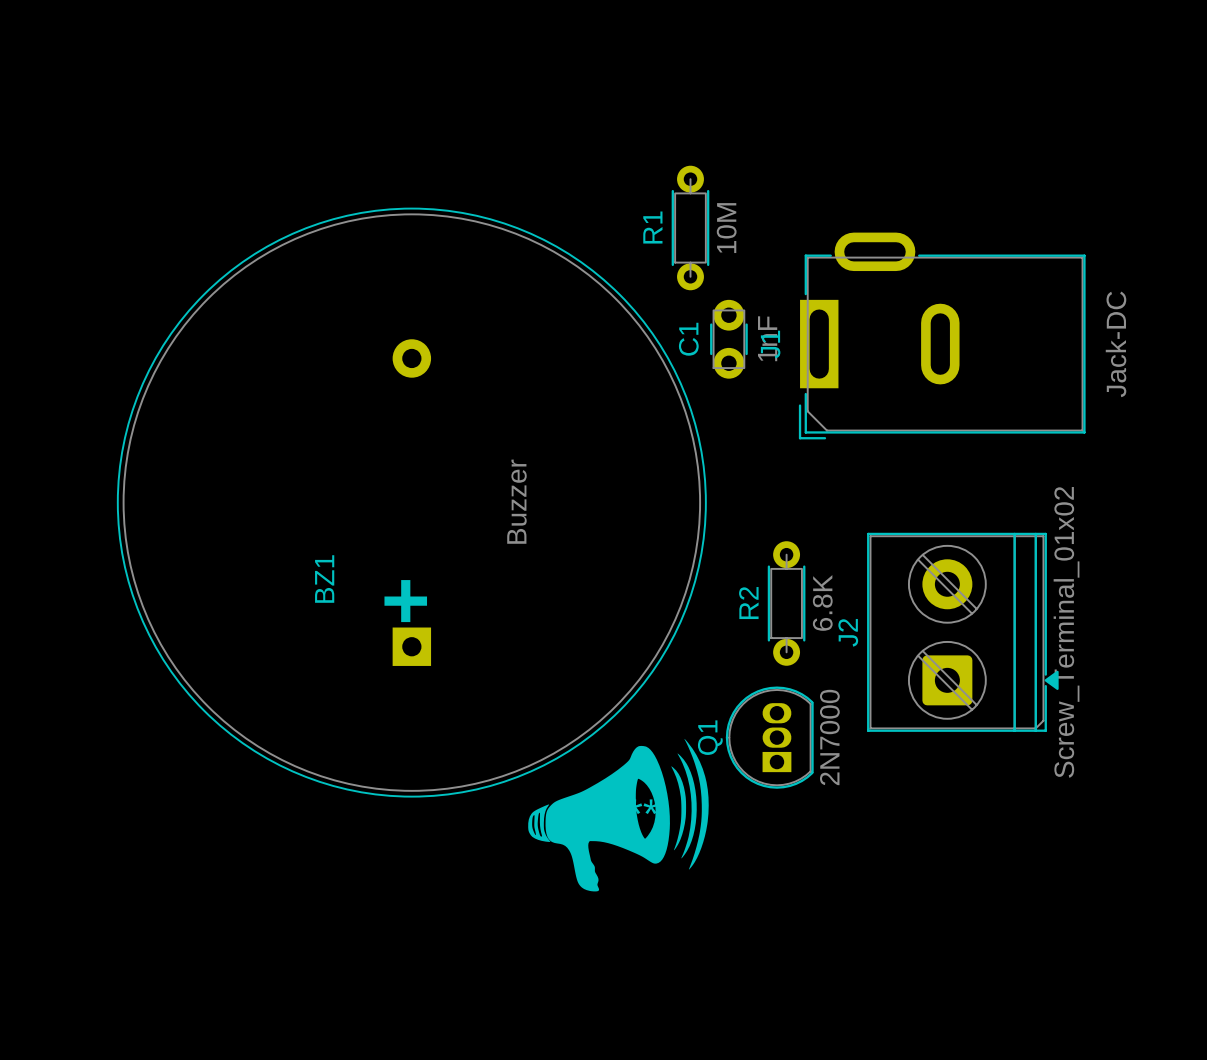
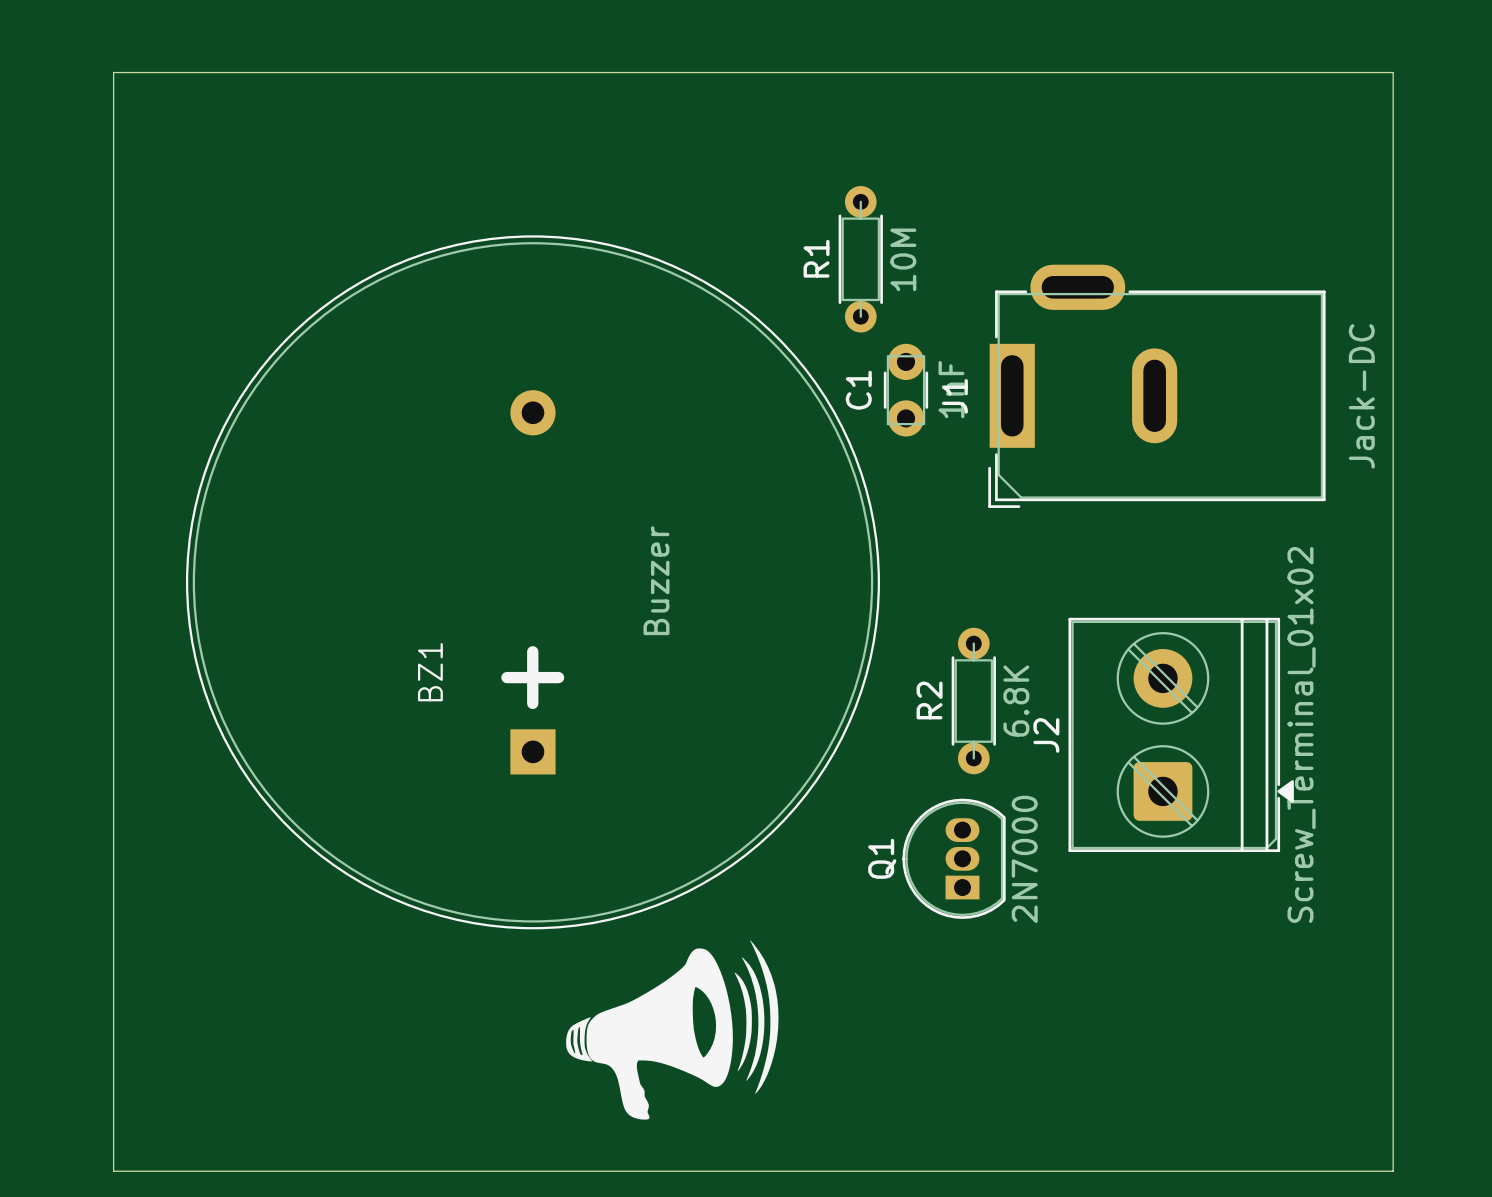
board edge: none -> (113, 72) (1393, 72) (1393, 1171) (113, 1171) (113, 72)
drawing: none -> [566, 940, 779, 1120]
part: (618, 815) -> none

